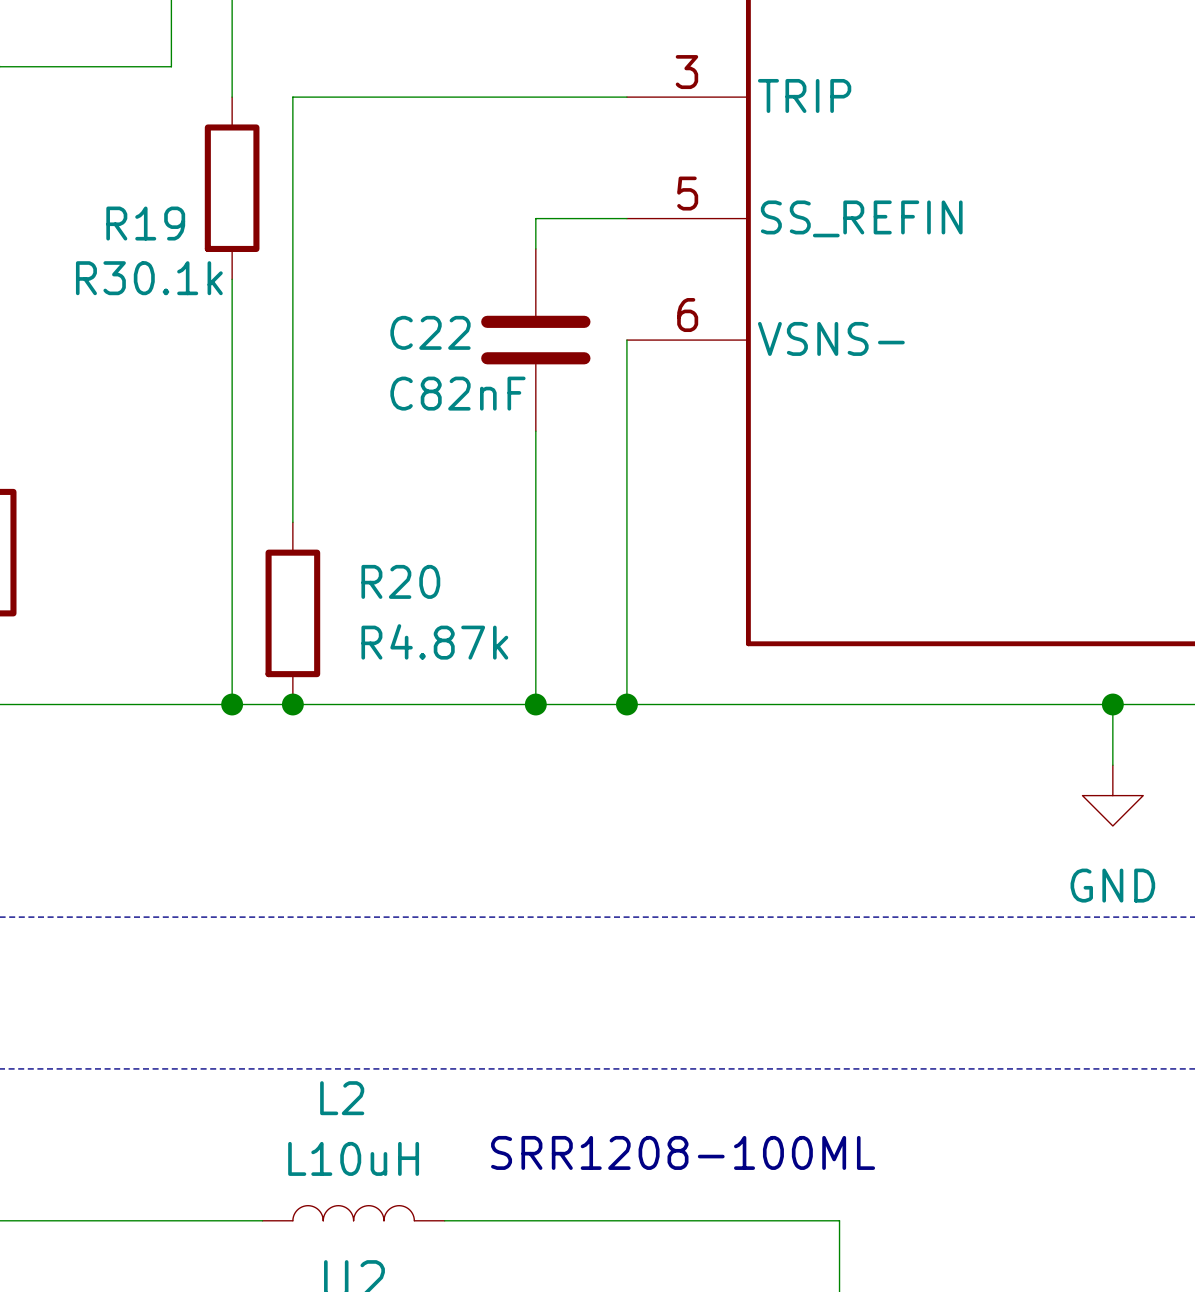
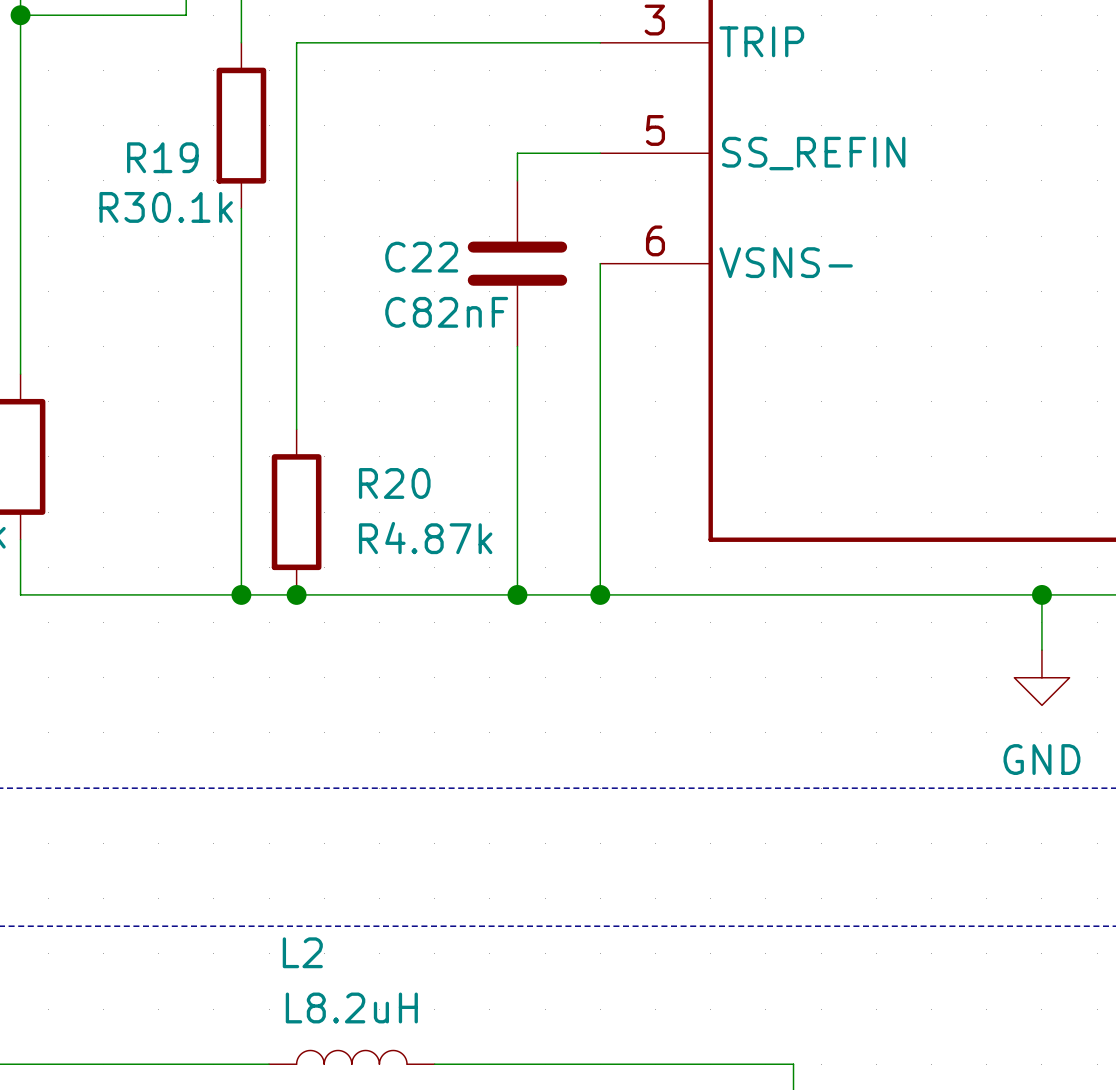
L2 name position: L2 (342, 1098) -> L2 (302, 952)
text: SRR1208-100ML (683, 1152) -> none
L2 value: L10uH (353, 1158) -> L8.2uH (351, 1007)

